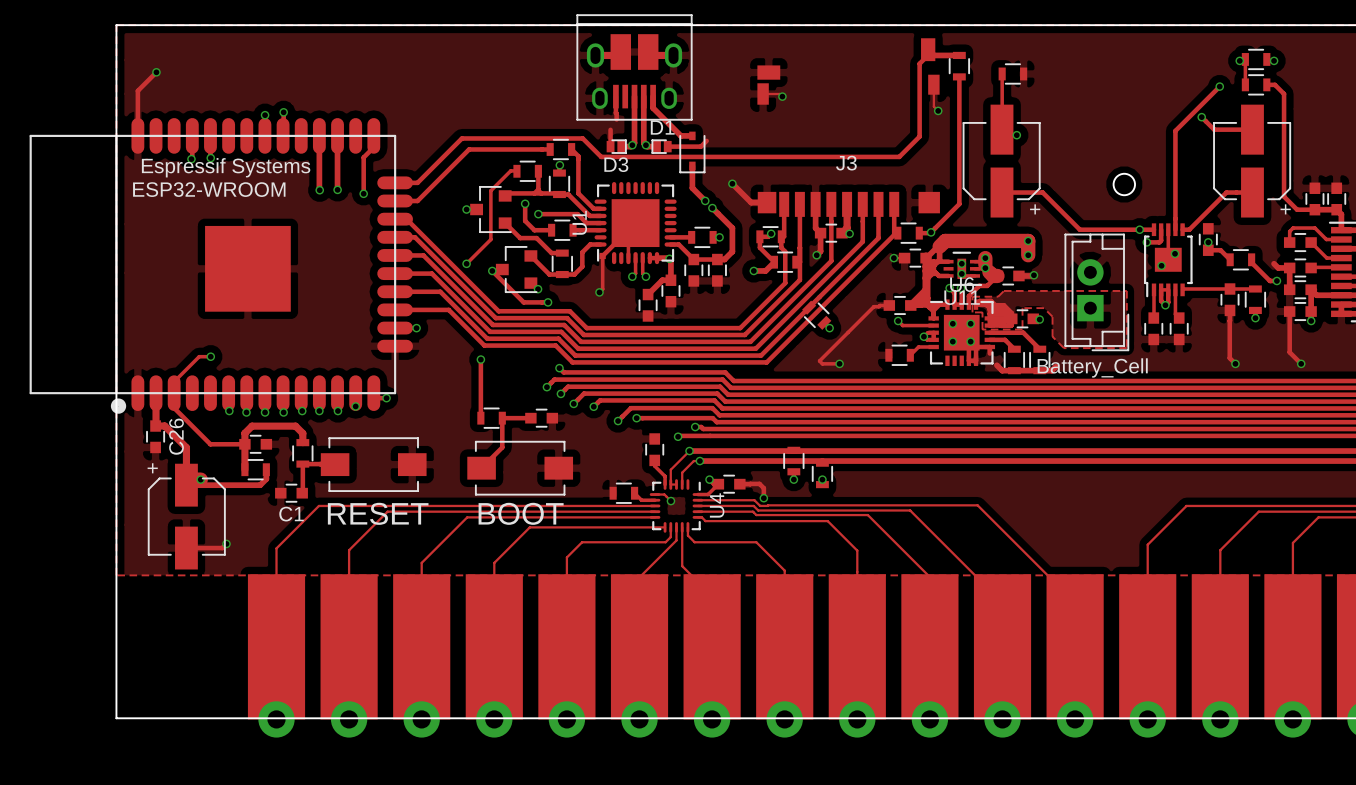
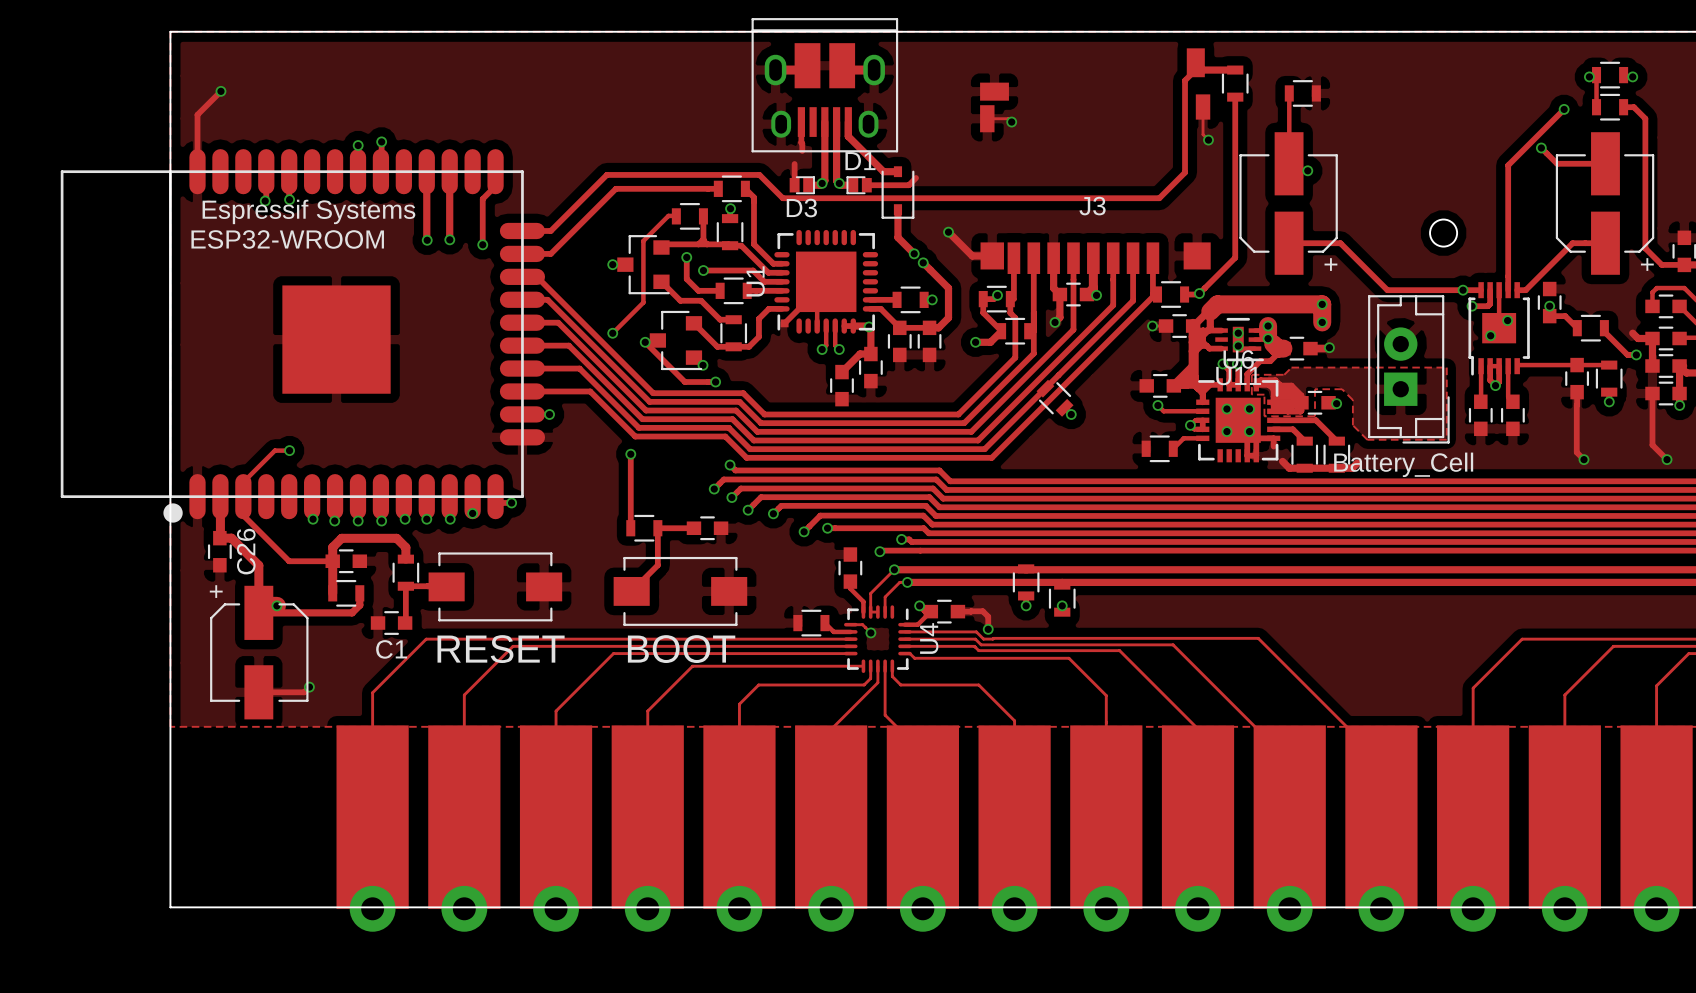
track: (602, 255) (602, 289) (599, 292) -> none
via: (599, 292) -> none
track: (889, 305) (873, 306) (819, 361) (822, 363) (839, 363) -> none
via: (839, 363) -> none

